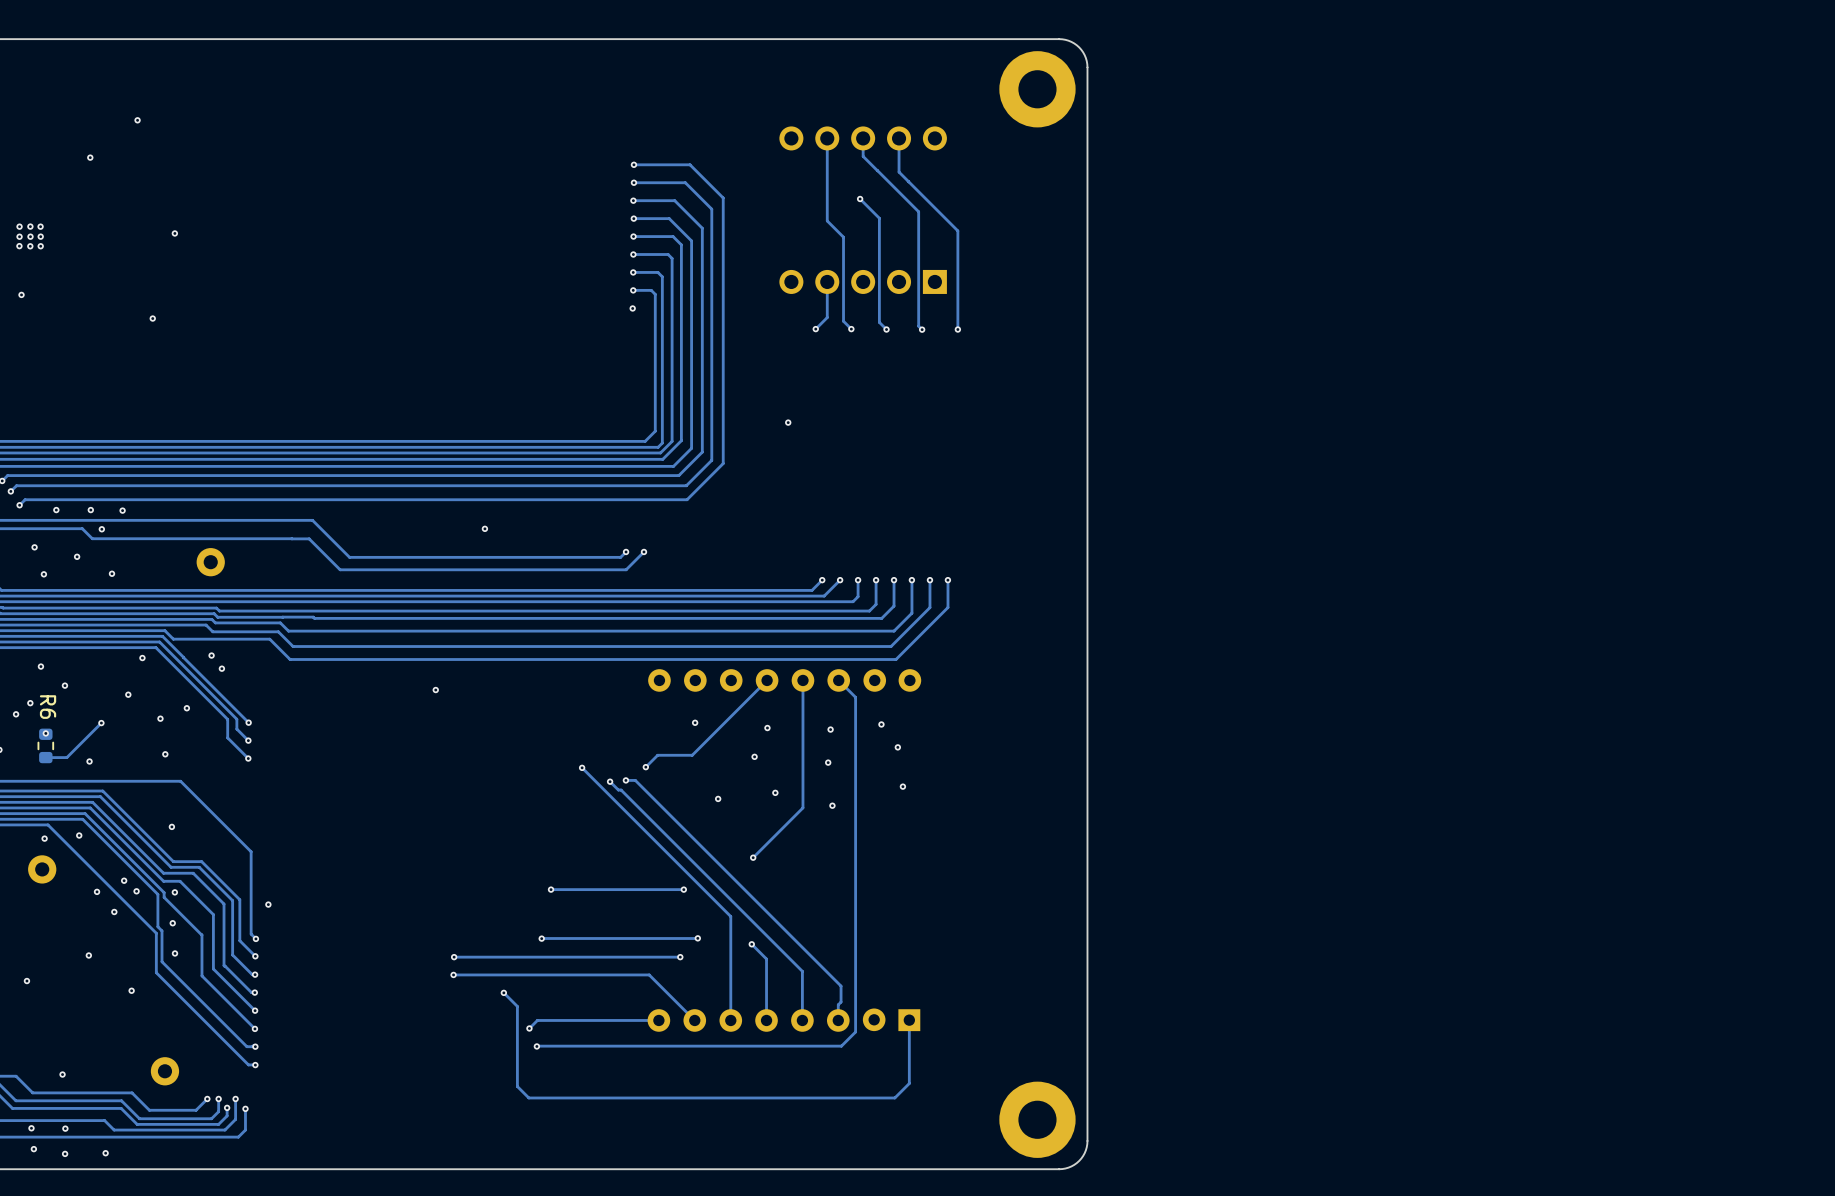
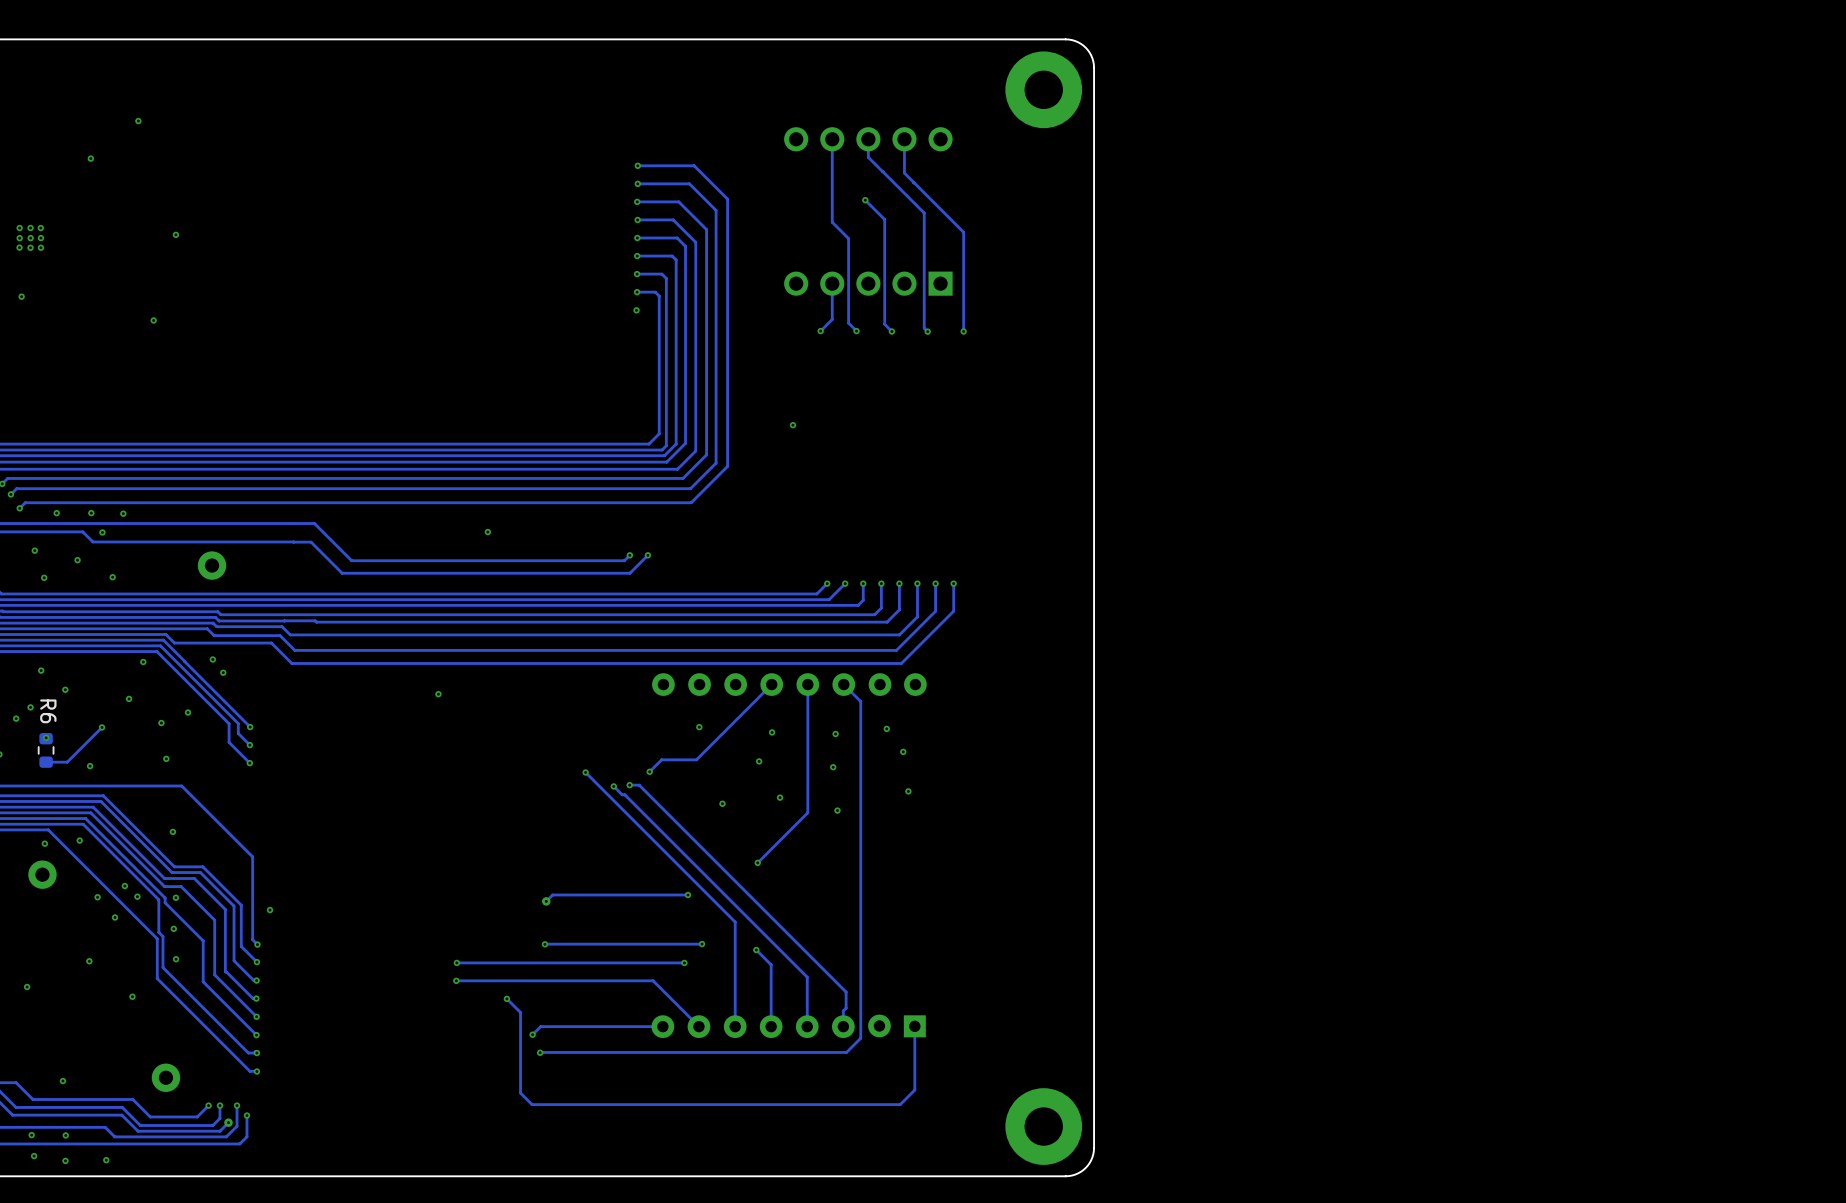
track: none -> (554, 894) (546, 901)
via: (551, 889) -> none
via: none -> (546, 901)
track: (227, 1107) (227, 1115) -> none
via: (227, 1107) -> none
via: none -> (228, 1122)

